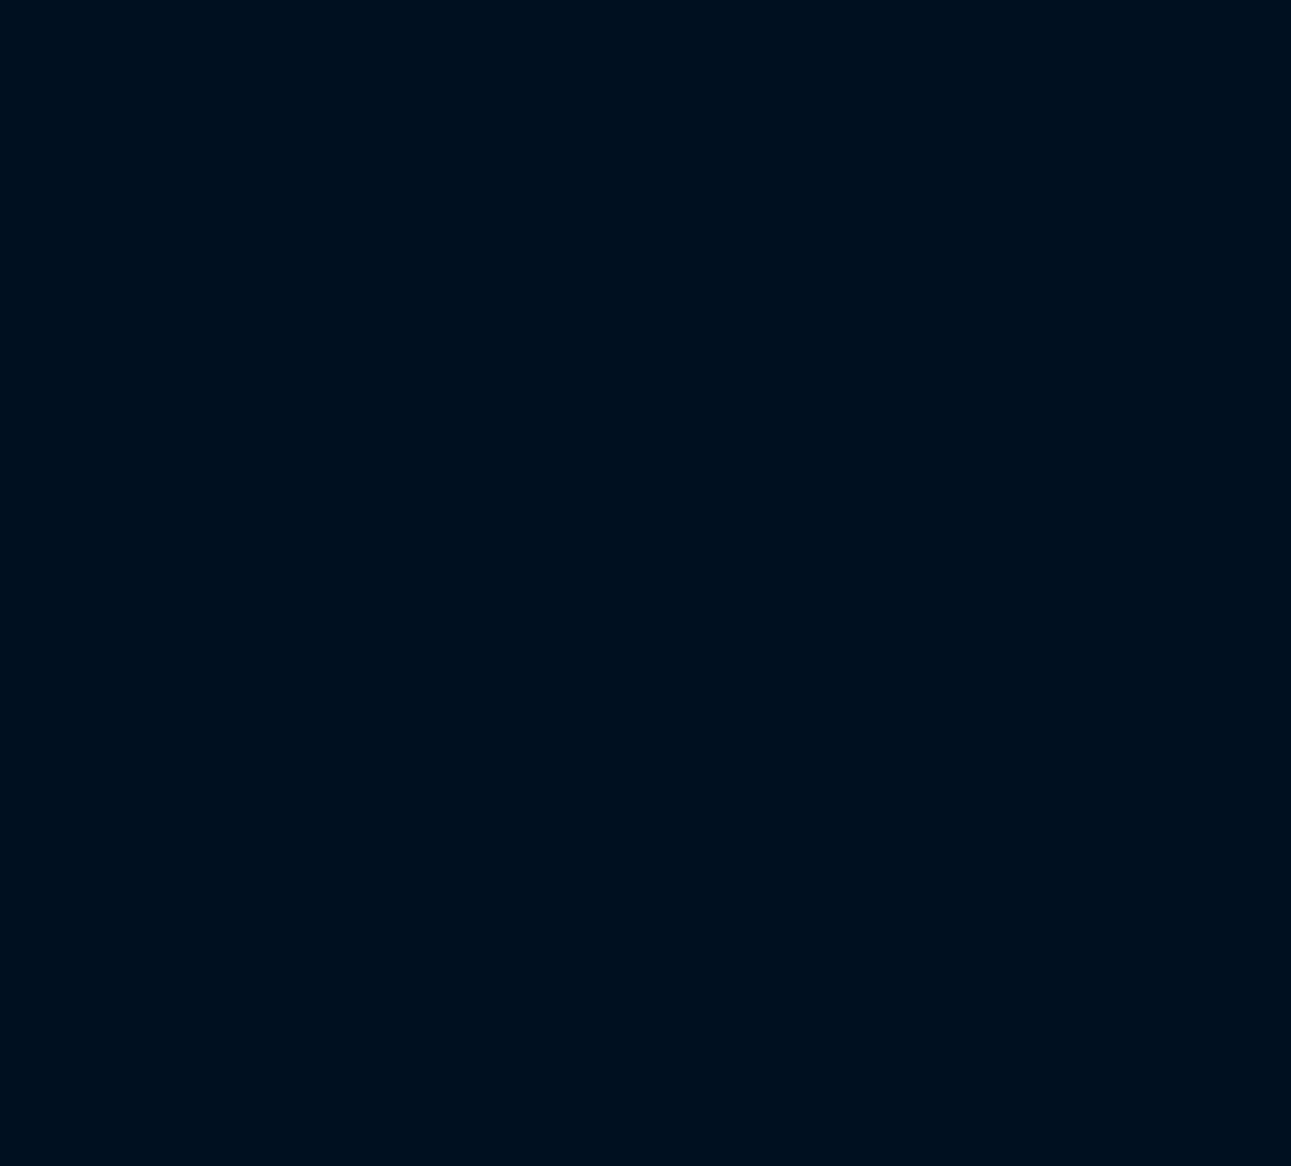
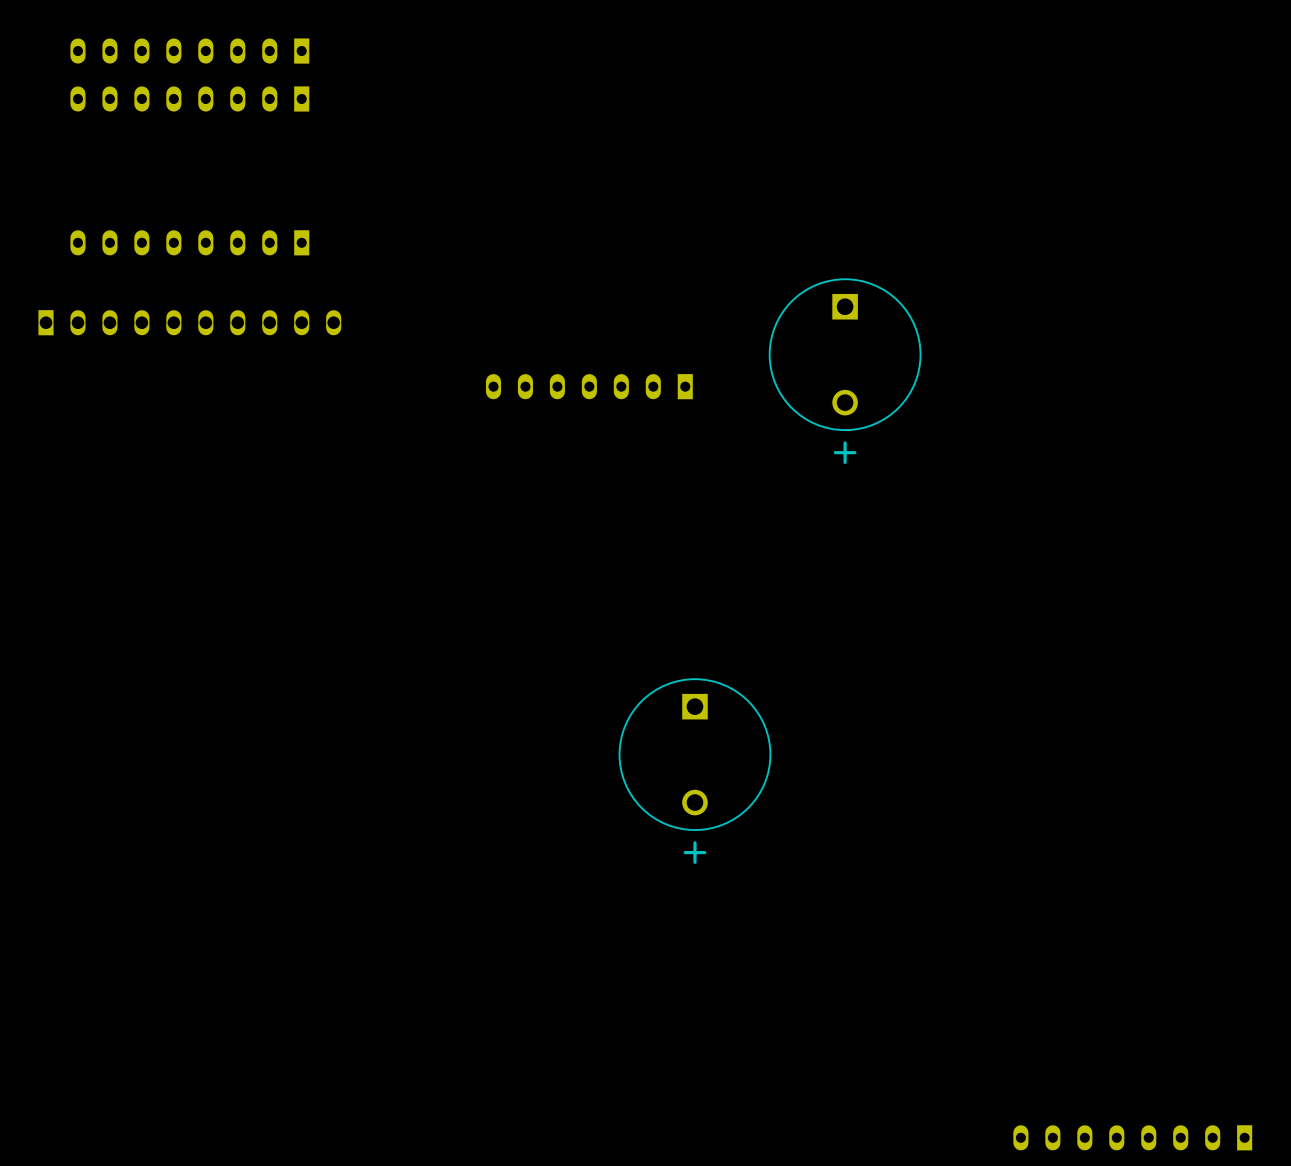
part: none -> (189, 51)
part: none -> (189, 98)
part: none -> (189, 242)
part: none -> (189, 322)
part: none -> (845, 354)
part: none -> (589, 386)
part: none -> (694, 754)
part: none -> (1132, 1137)

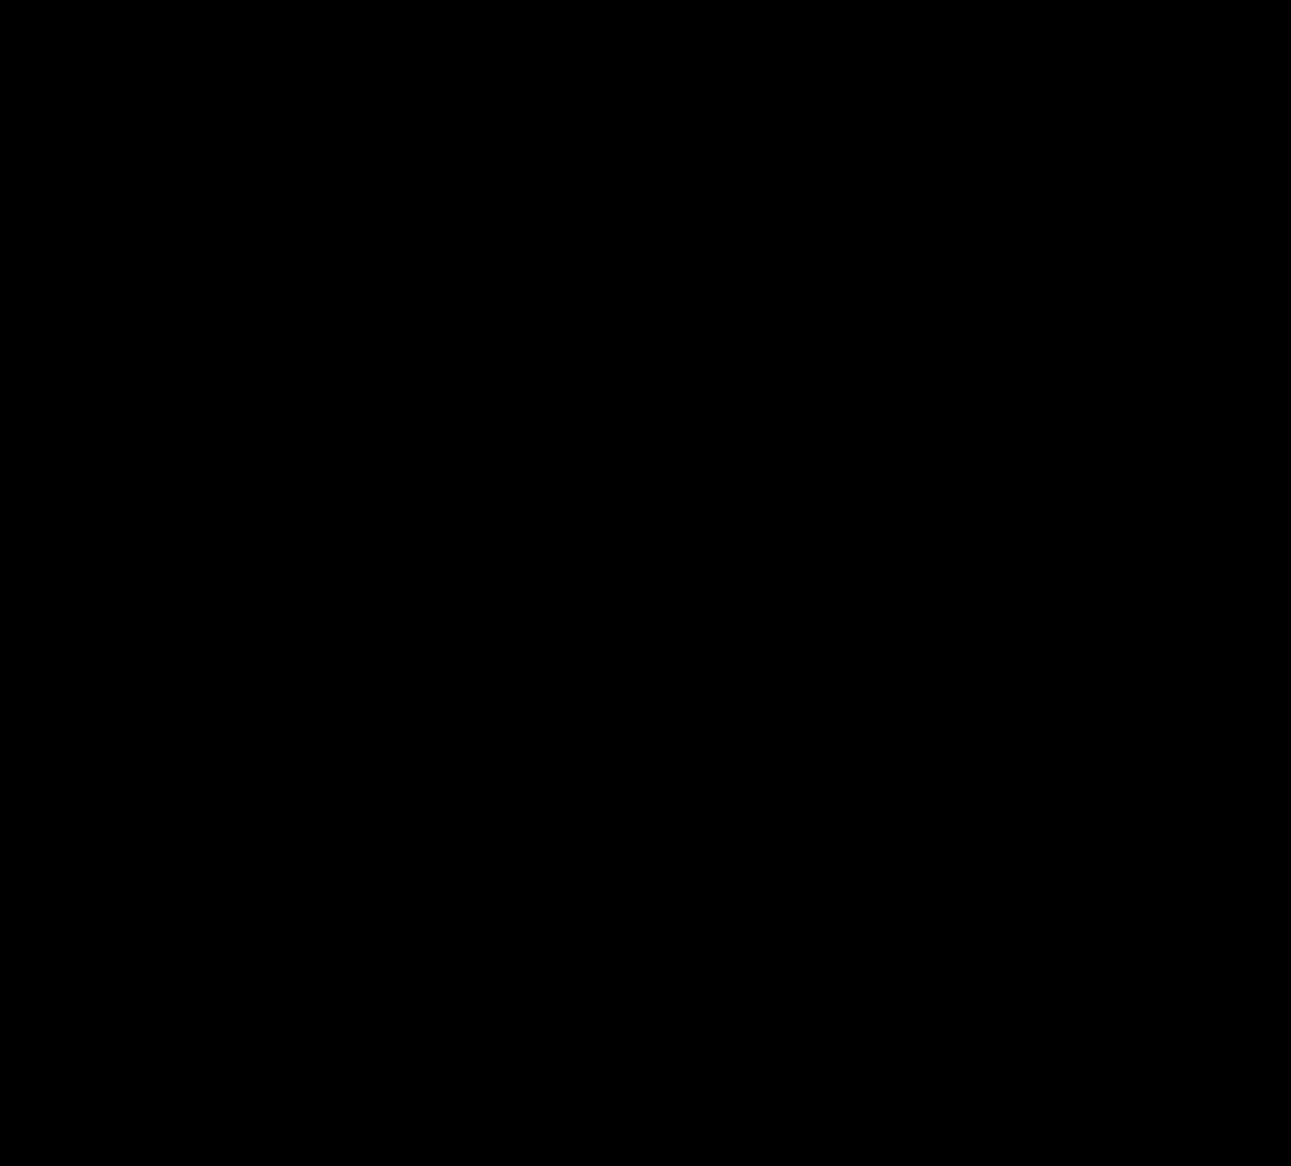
part: (189, 51) -> none
part: (189, 98) -> none
part: (189, 242) -> none
part: (189, 322) -> none
part: (845, 354) -> none
part: (589, 386) -> none
part: (694, 754) -> none
part: (1132, 1137) -> none

